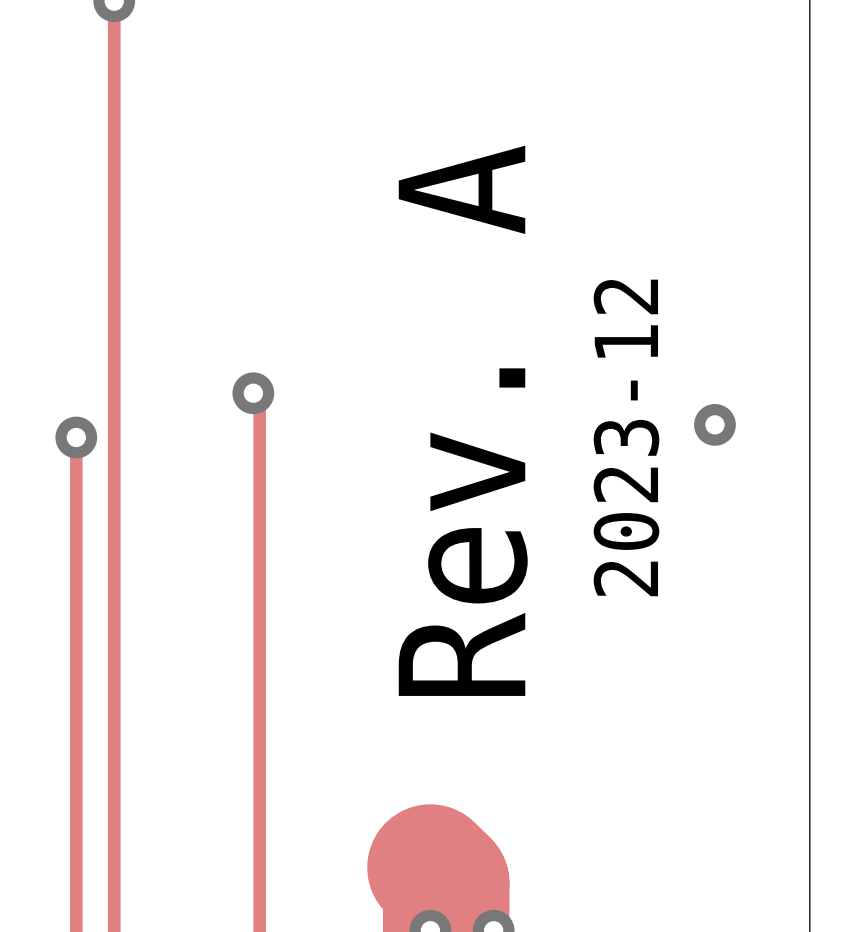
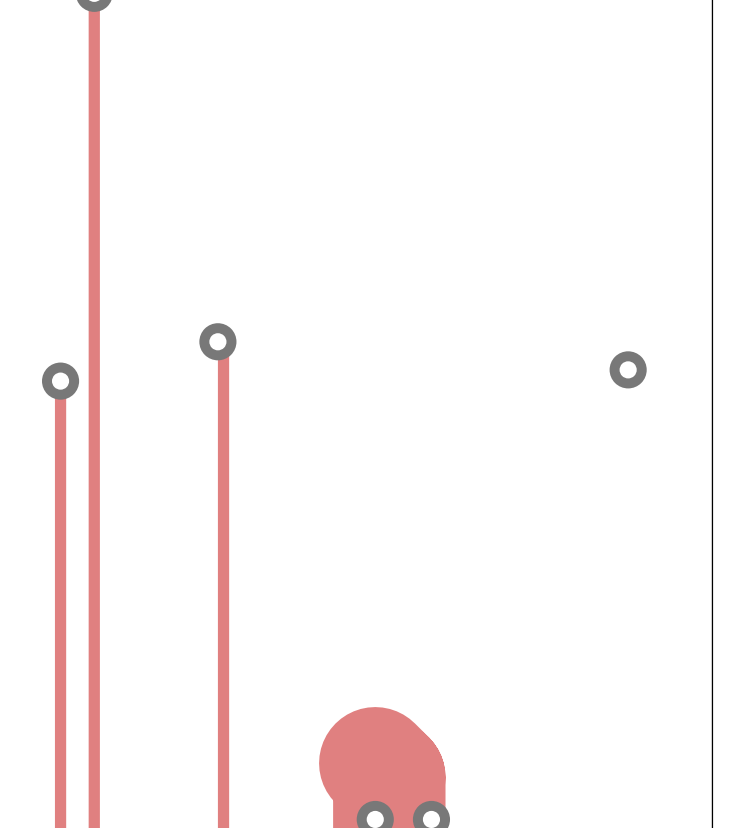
text: Rev. A (463, 420) -> none
text: 2023-12 (626, 437) -> none

